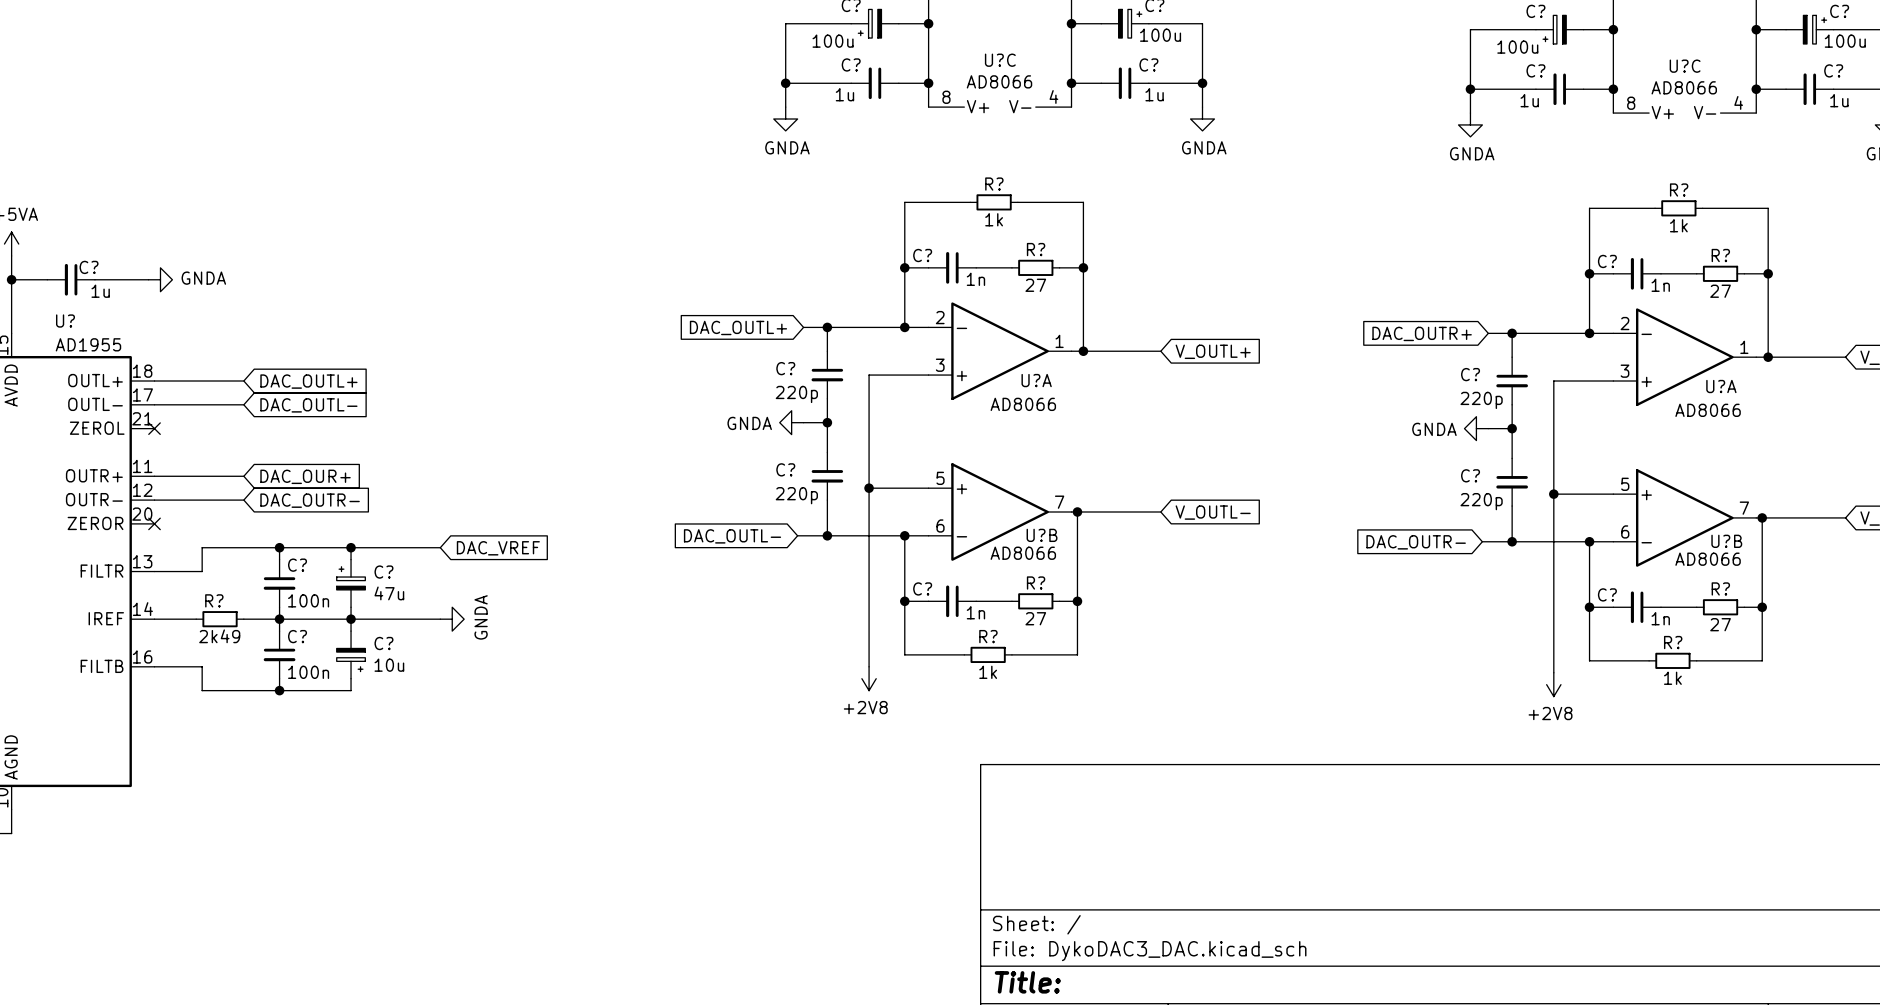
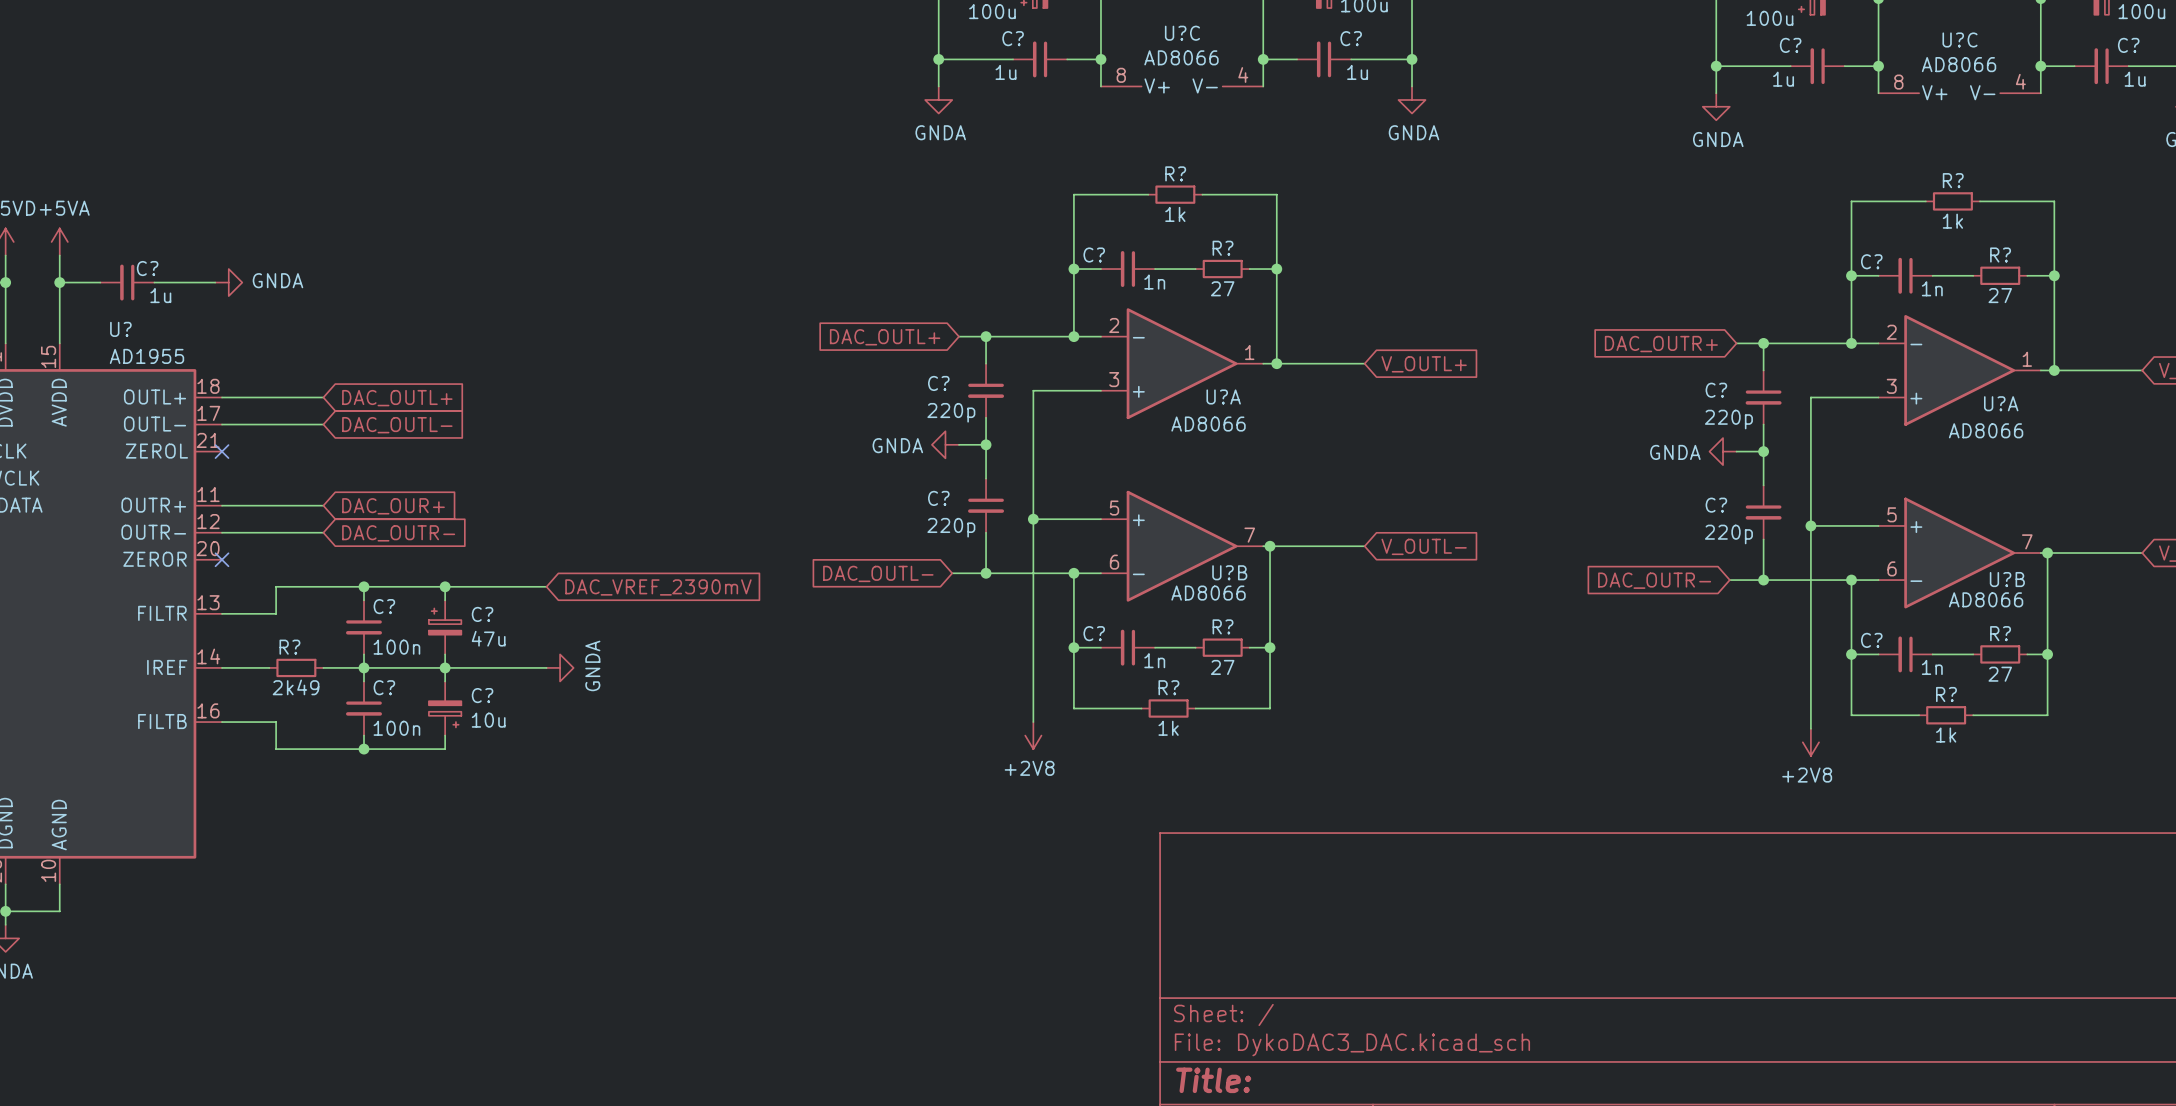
global label: DAC_VREF (498, 548) -> DAC_VREF_2390mV (658, 587)

